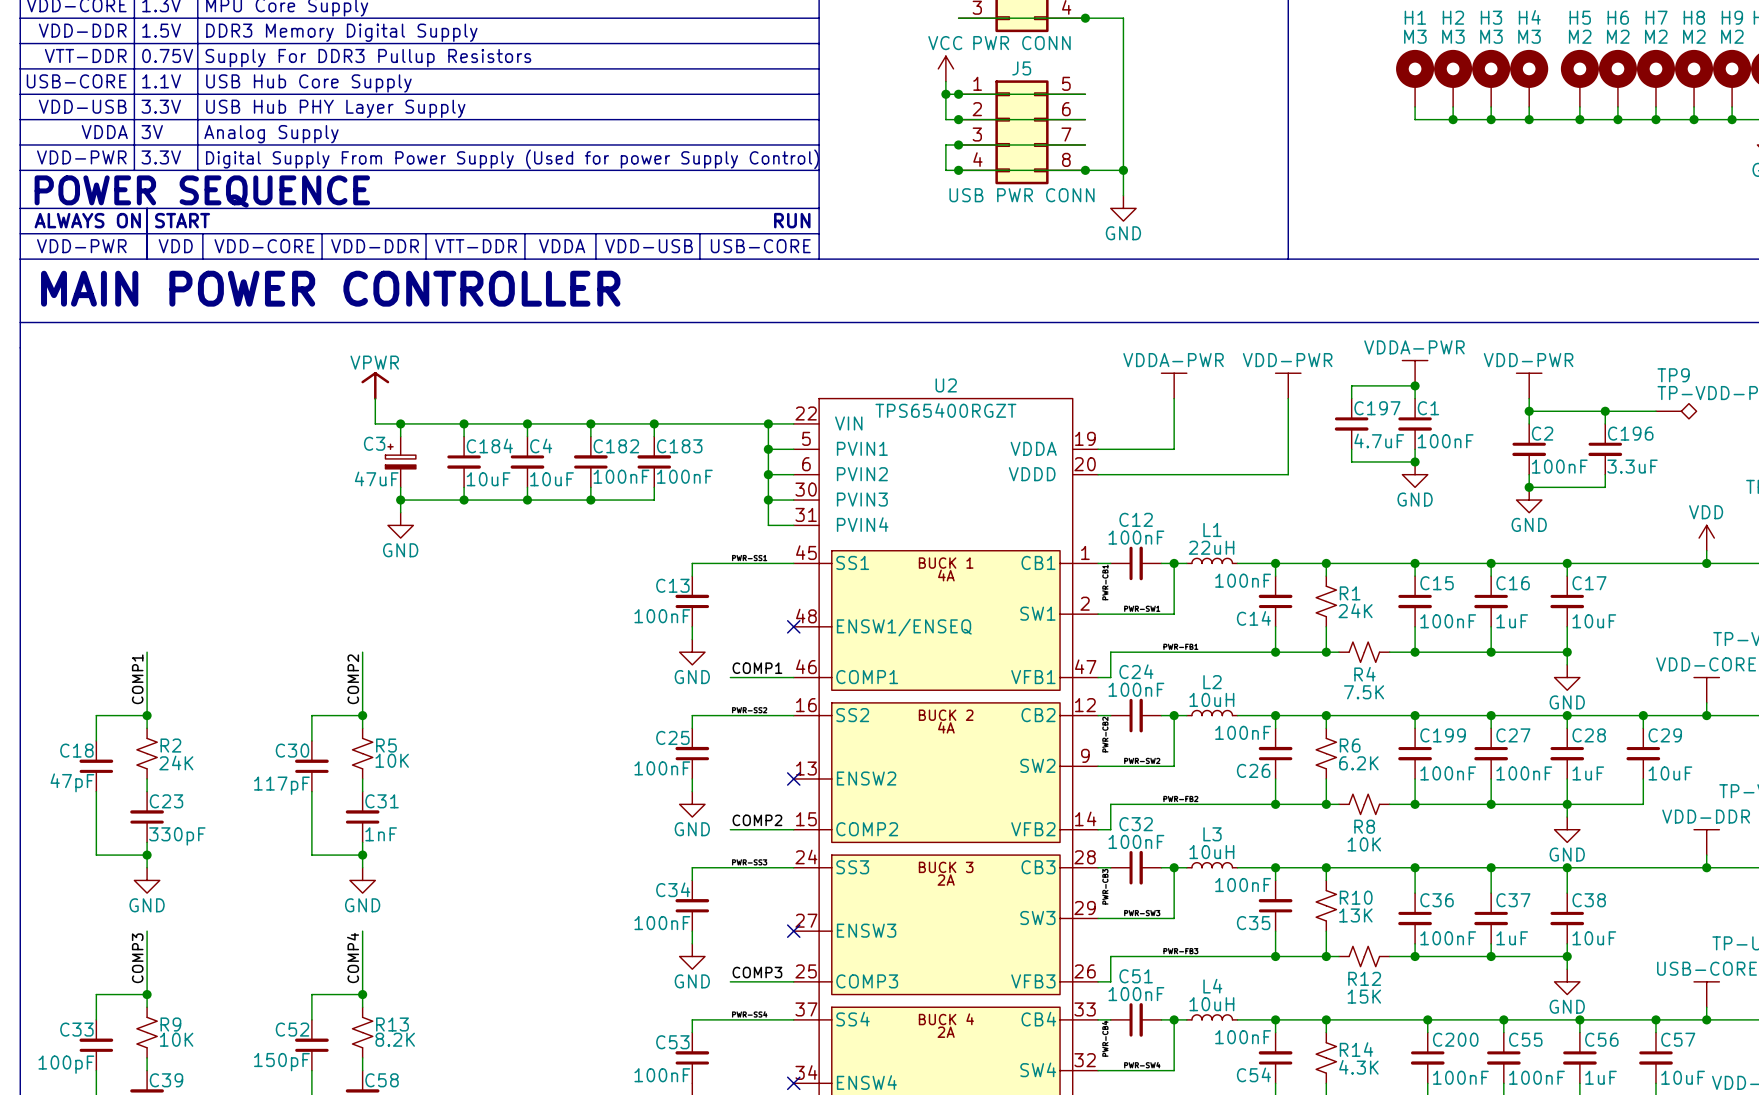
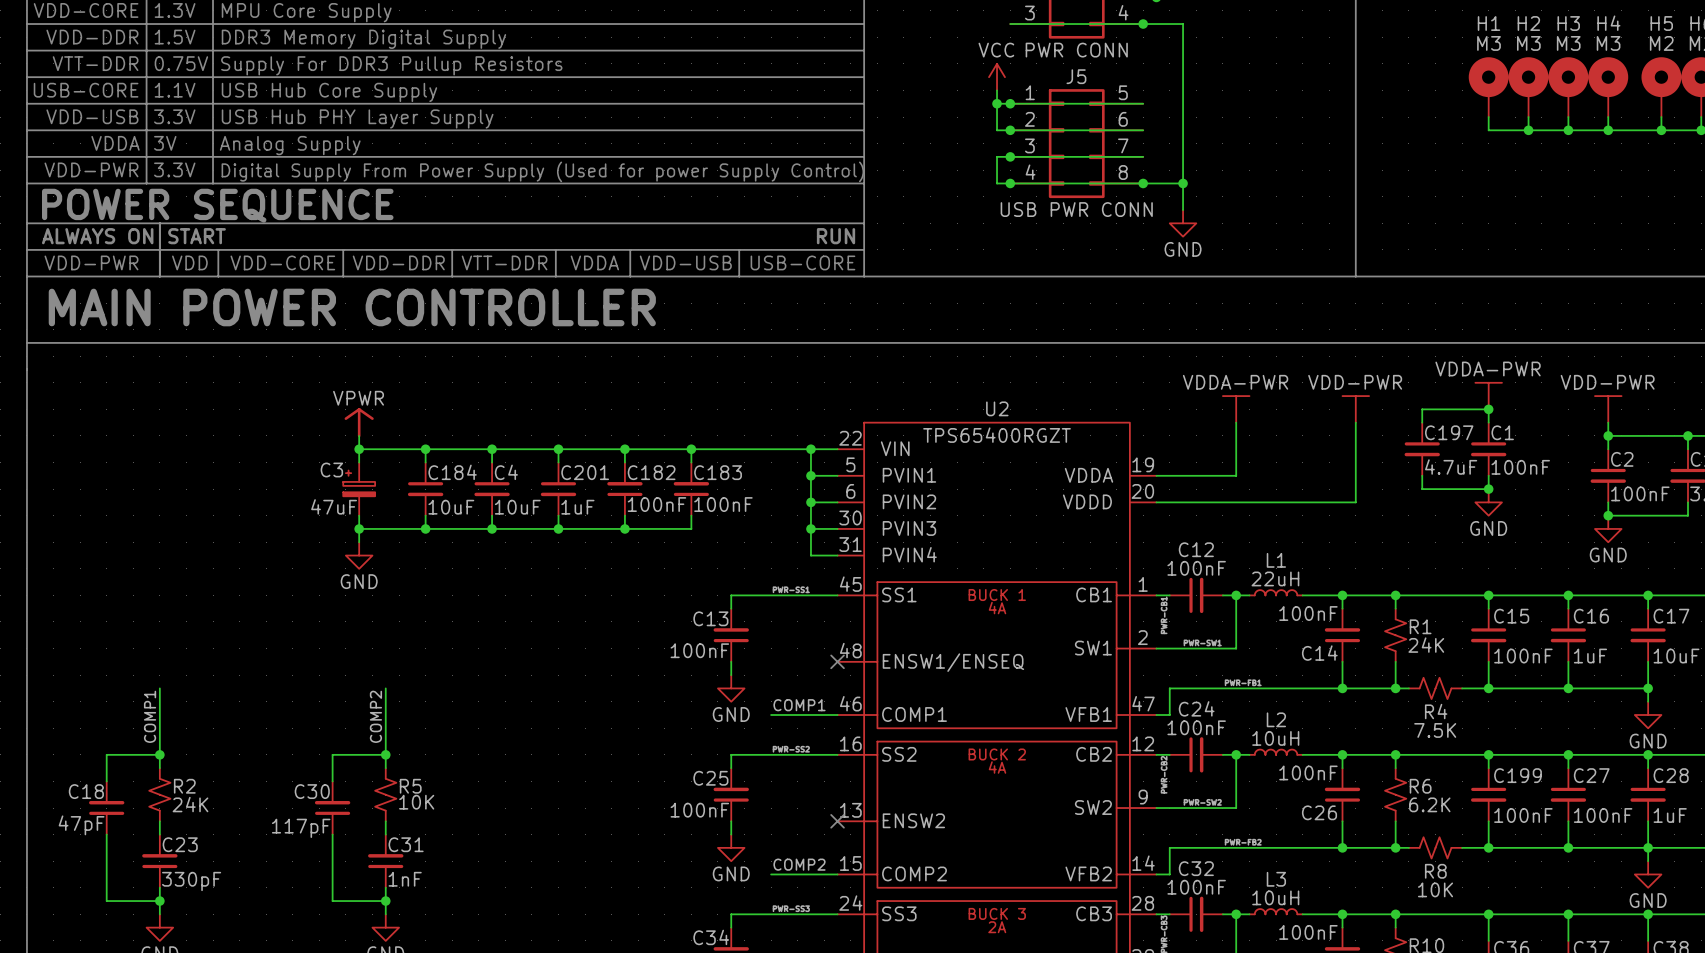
power symbol position: VPWR (375, 385) -> VPWR (359, 422)
wire: (375, 398) (375, 423) -> (359, 449) (399, 449)
wire: none -> (359, 435) (359, 462)
junction: none -> (359, 449)
C184 name: C184 (489, 446) -> C4 (506, 472)
C4 name: C4 (541, 446) -> C201 (585, 472)
C3 position: (400, 461) -> (359, 489)
C184: none -> 10uF (425, 489)
C4 value: 10uF (552, 479) -> 1uF (577, 507)
wire: none -> (359, 515) (359, 542)
junction: none -> (359, 528)
wire: (400, 500) (400, 512) -> (425, 528) (359, 528)
power symbol position: GND (400, 525) -> GND (359, 555)

